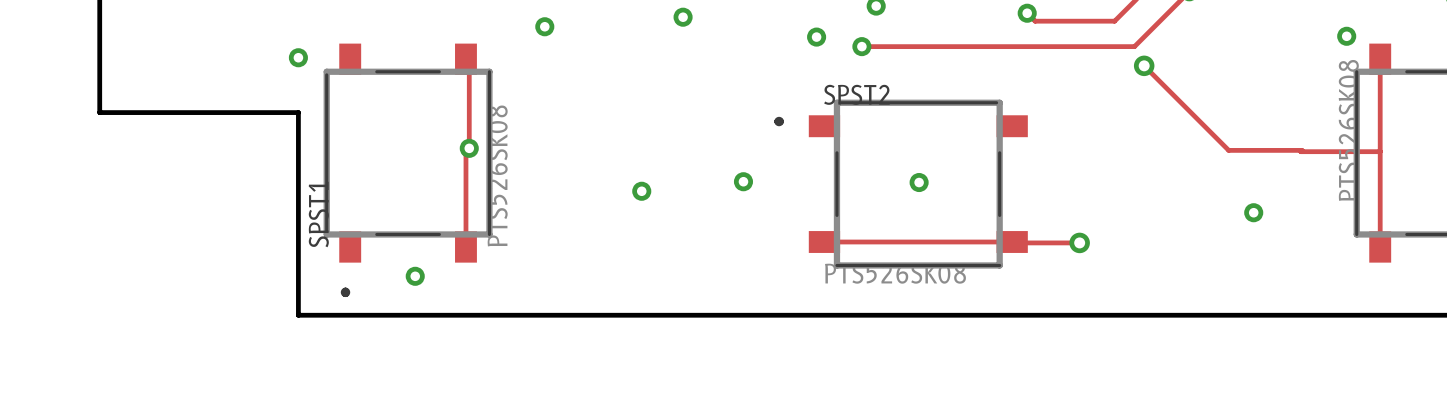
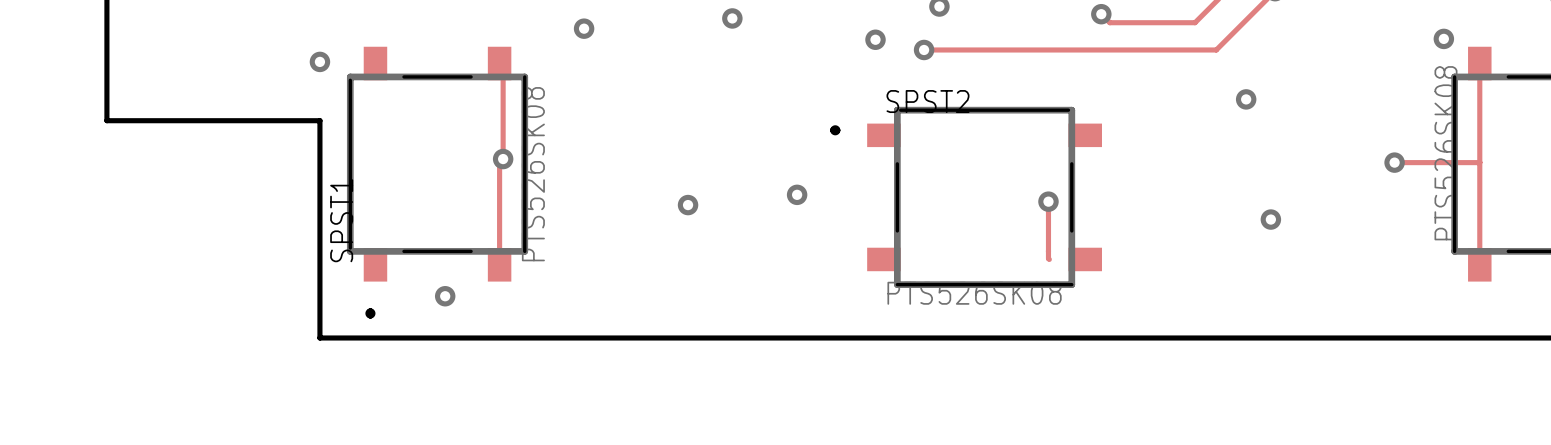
track: (1144, 65) (1228, 150) (1302, 150) -> none
via: (1144, 65) -> none
via: none -> (1246, 99)
via: none -> (1394, 162)
via position: (919, 182) -> (1048, 201)
track: none -> (1048, 201) (1049, 259)
via: none -> (1270, 219)
via: (1253, 212) -> none
track: (824, 242) (1079, 242) -> none
via: (1079, 242) -> none

